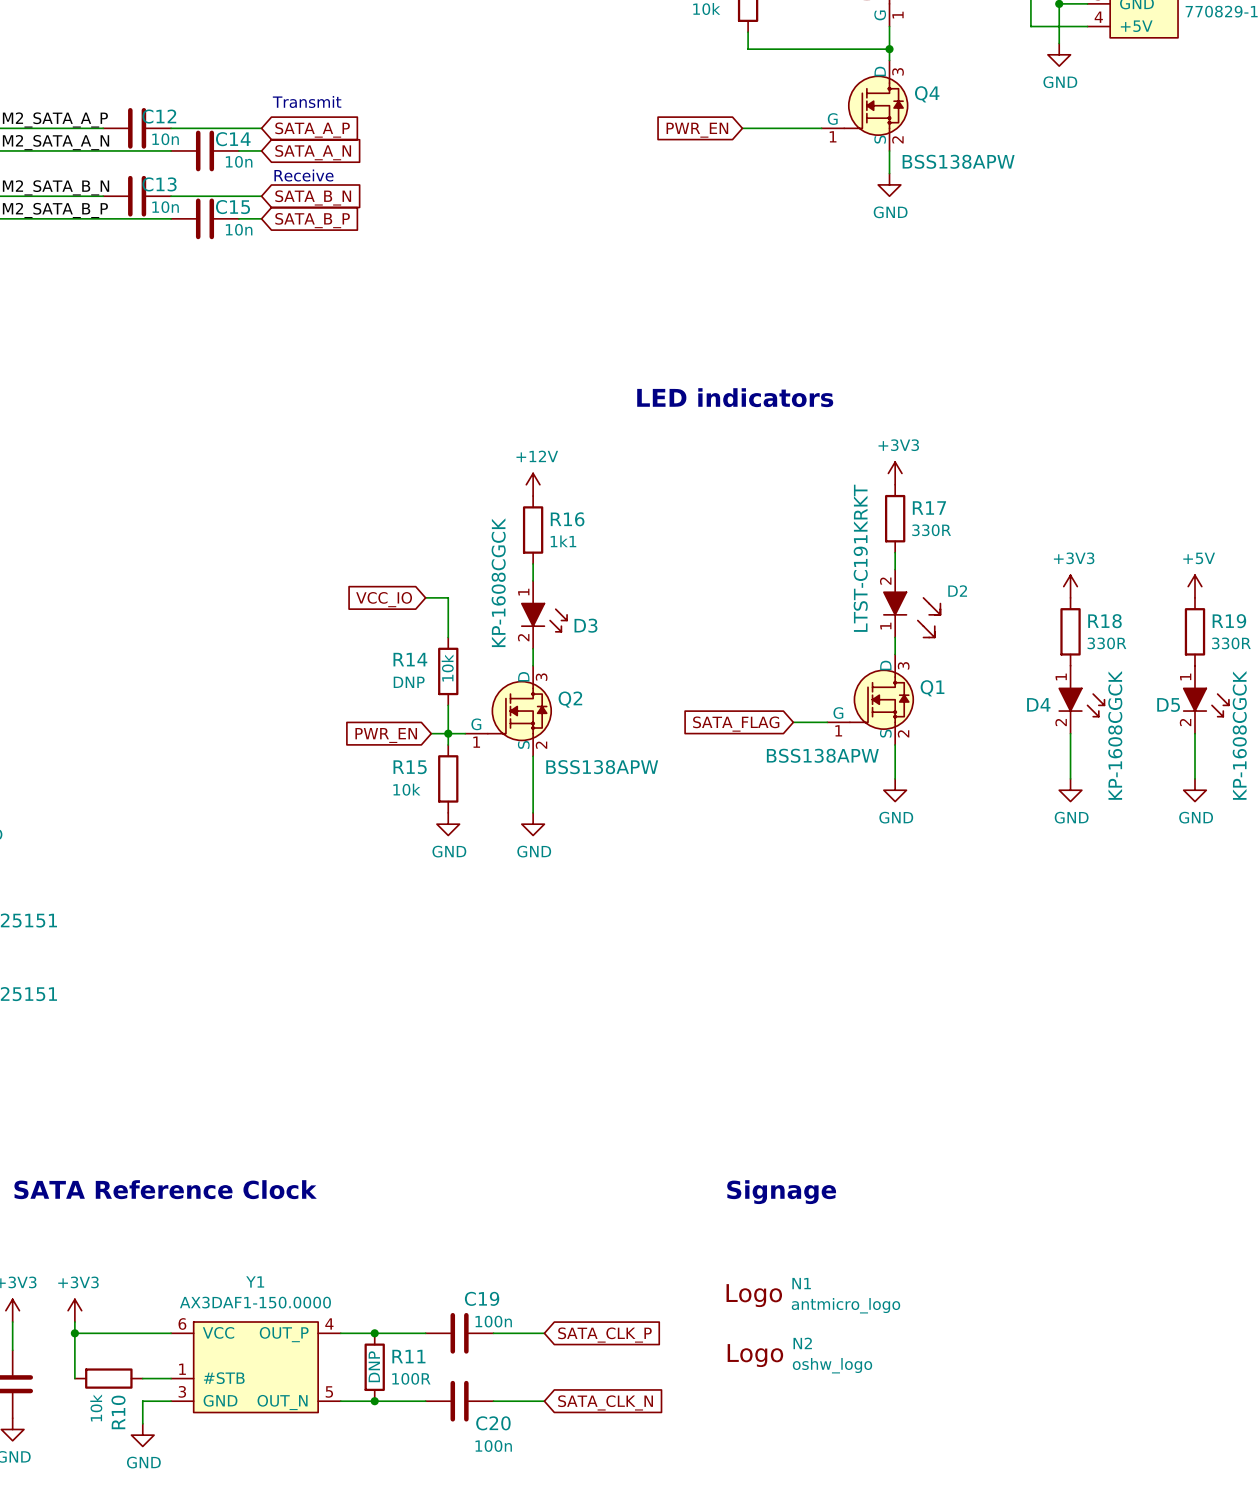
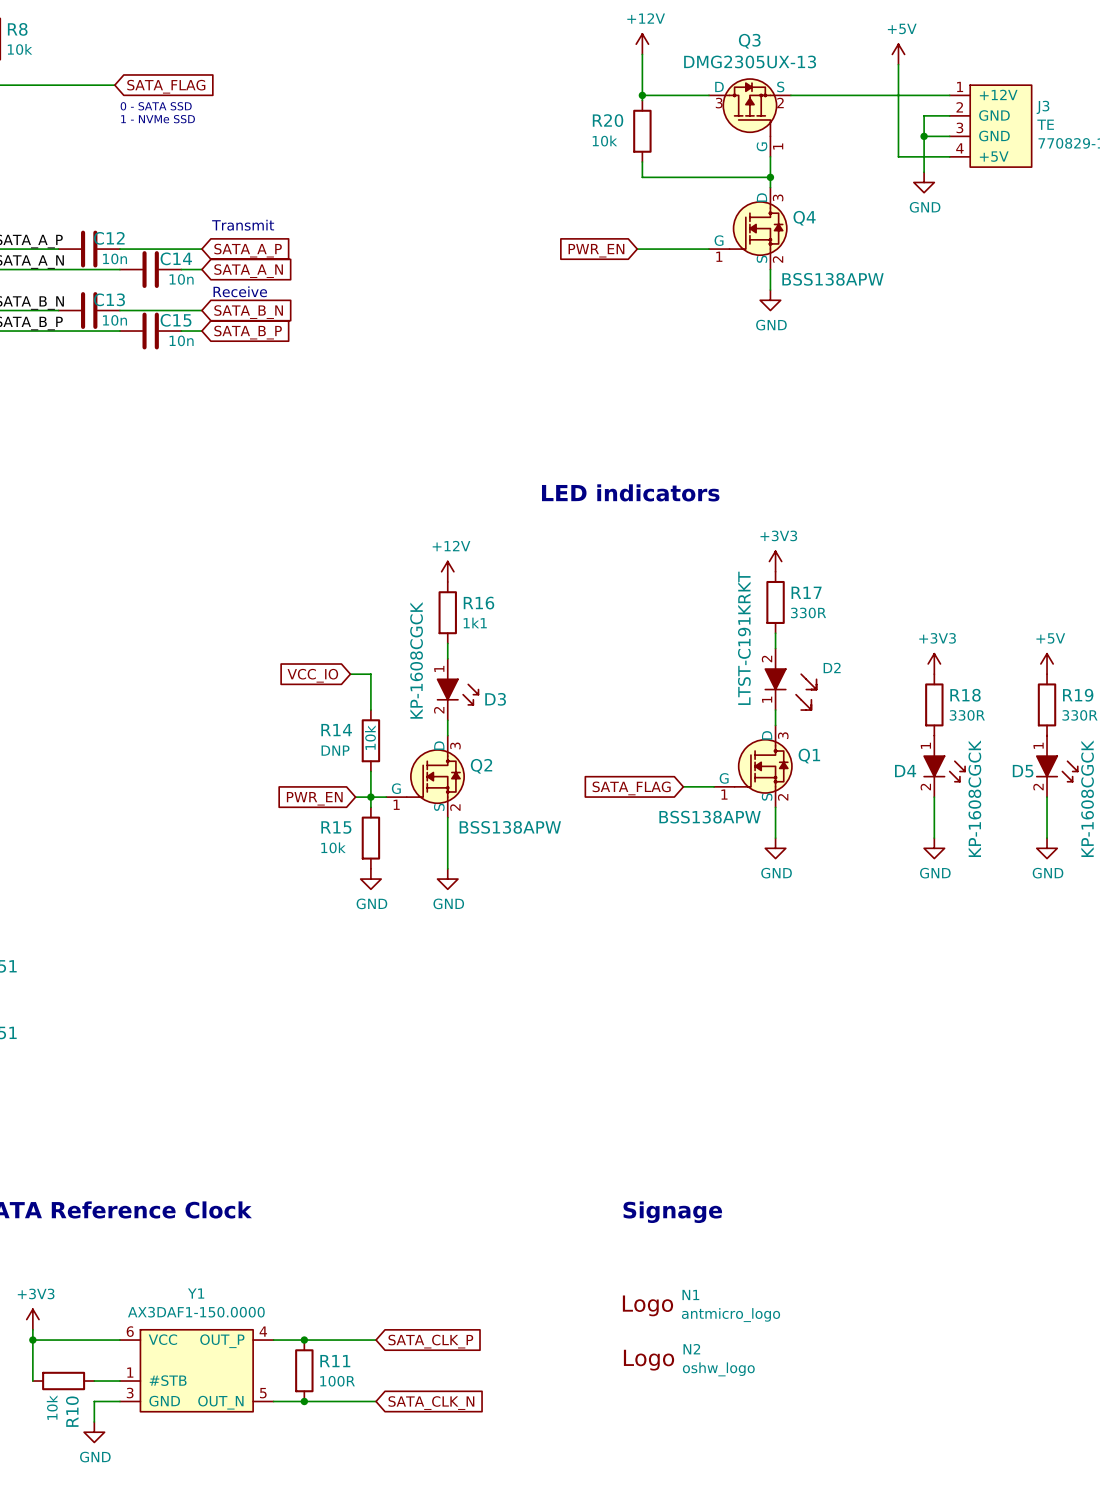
C19: (459, 1333) -> none
wire: (493, 1333) (544, 1333) -> none
global label position: SATA_CLK_P (604, 1335) -> SATA_CLK_P (430, 1341)
R11 text: DNP (374, 1366) -> none
C20: (459, 1401) -> none
wire: (493, 1401) (544, 1401) -> none
global label position: SATA_CLK_N (605, 1402) -> SATA_CLK_N (431, 1403)

